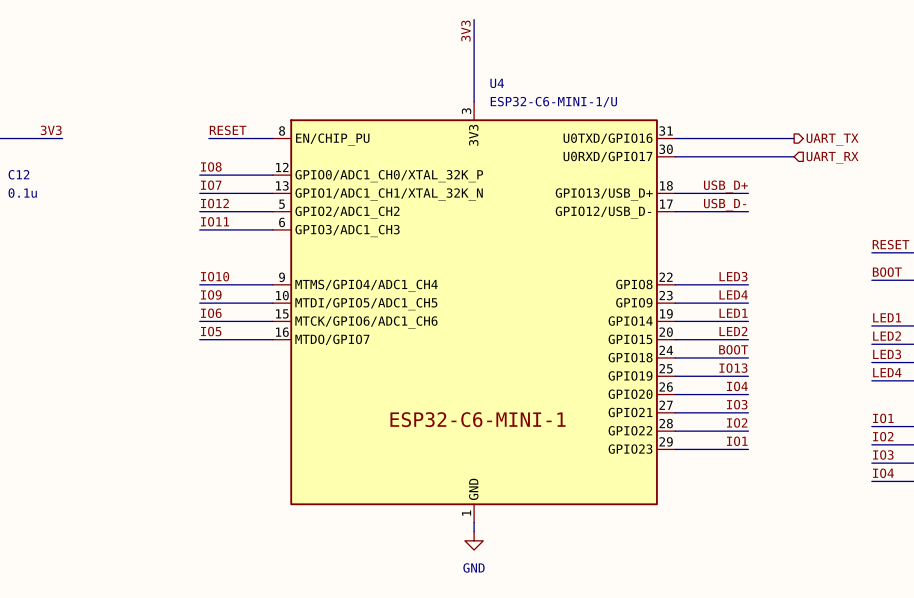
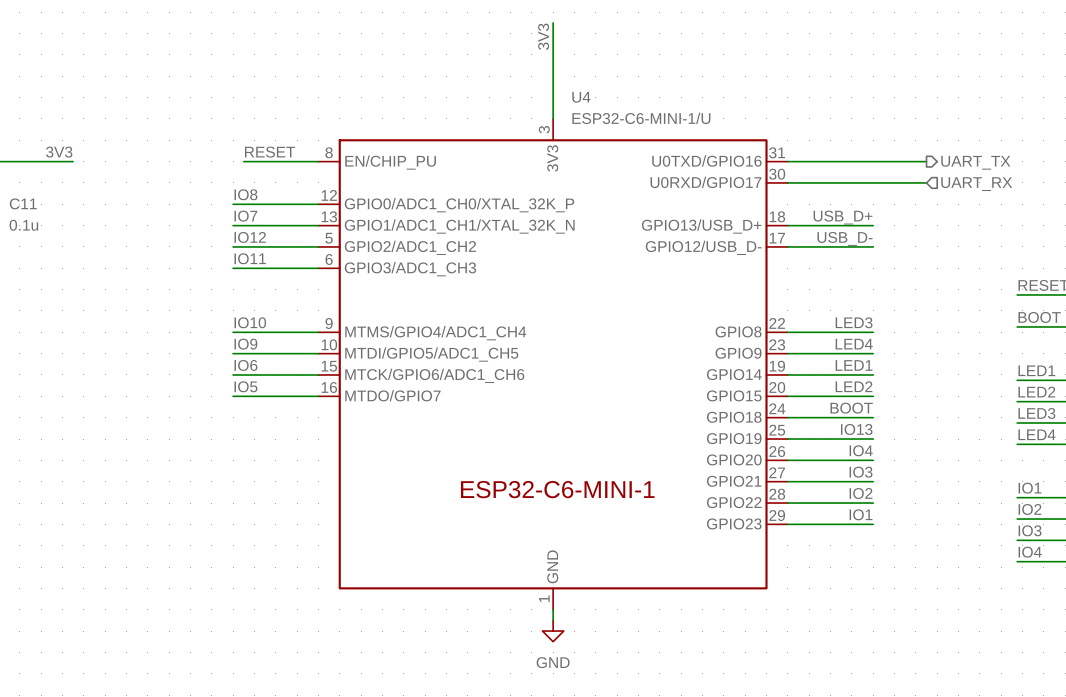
C12 name: C12 (18, 174) -> C11 (23, 203)

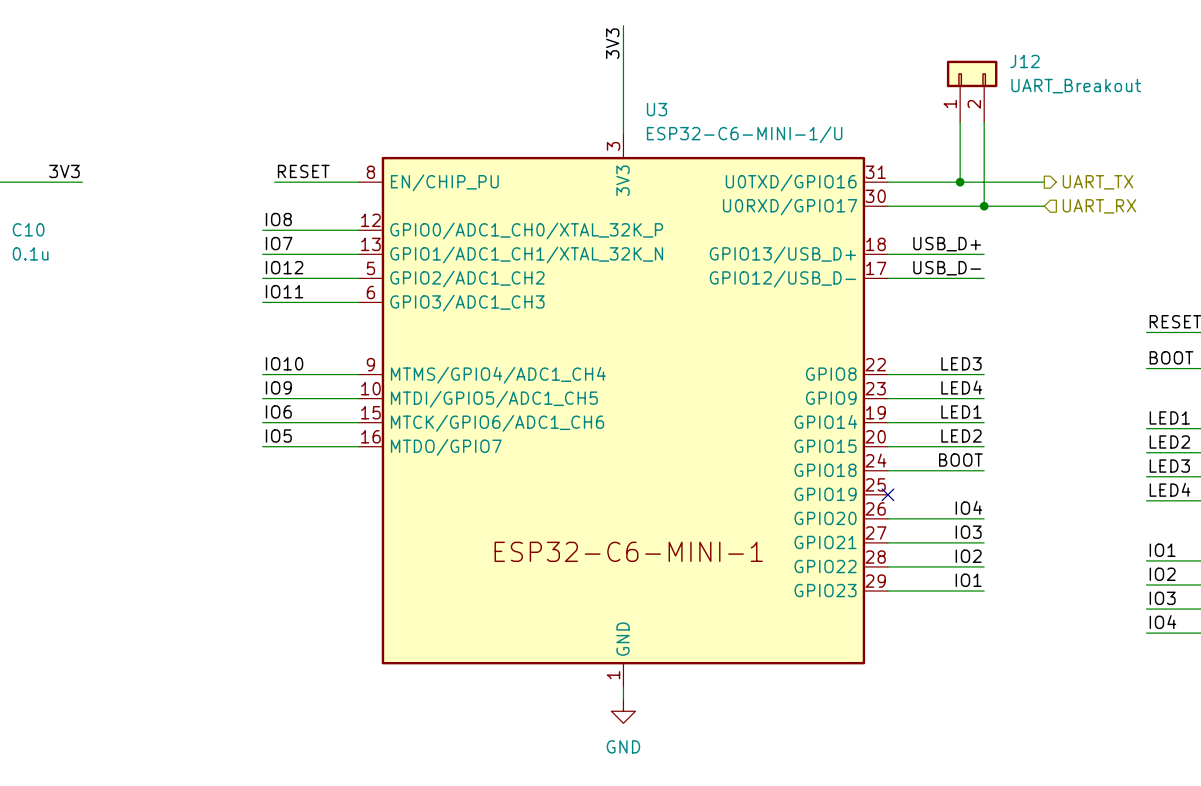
J12: none -> UART_Breakout (972, 91)
U4 name: U4 (581, 97) -> U3 (657, 109)
wire: none -> (960, 122) (960, 182)
wire: none -> (984, 122) (984, 206)
junction: none -> (960, 182)
junction: none -> (984, 206)
C11 name: C11 (23, 203) -> C10 (28, 229)
label: IO13 (856, 429) -> none
wire: (787, 439) (873, 439) -> none
no-connect mark: none -> (887, 494)

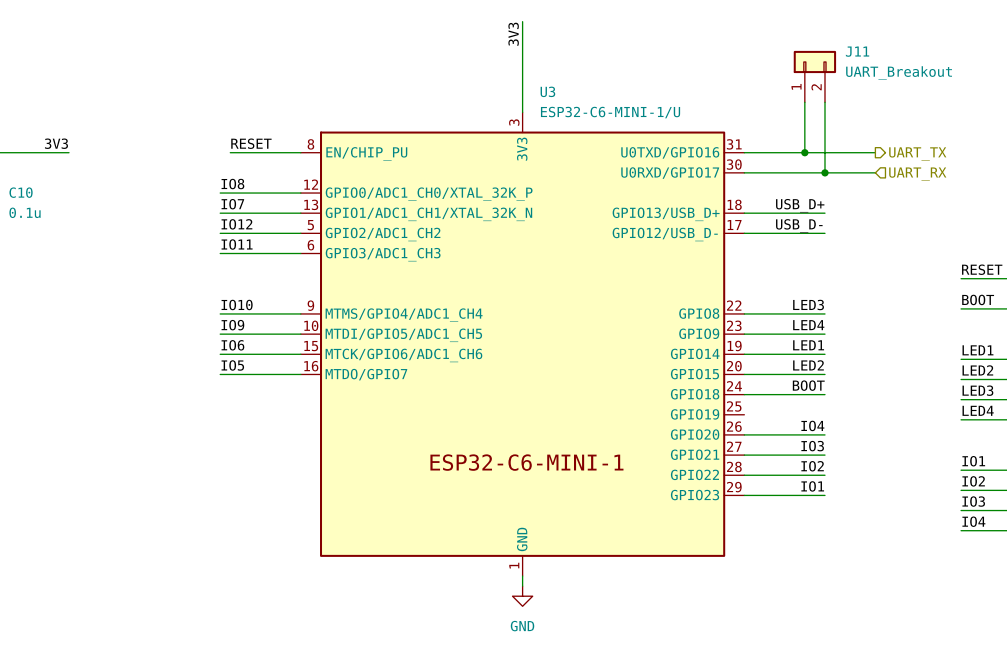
J12 name: J12 (1024, 61) -> J11 (857, 51)
no-connect mark: (887, 494) -> none

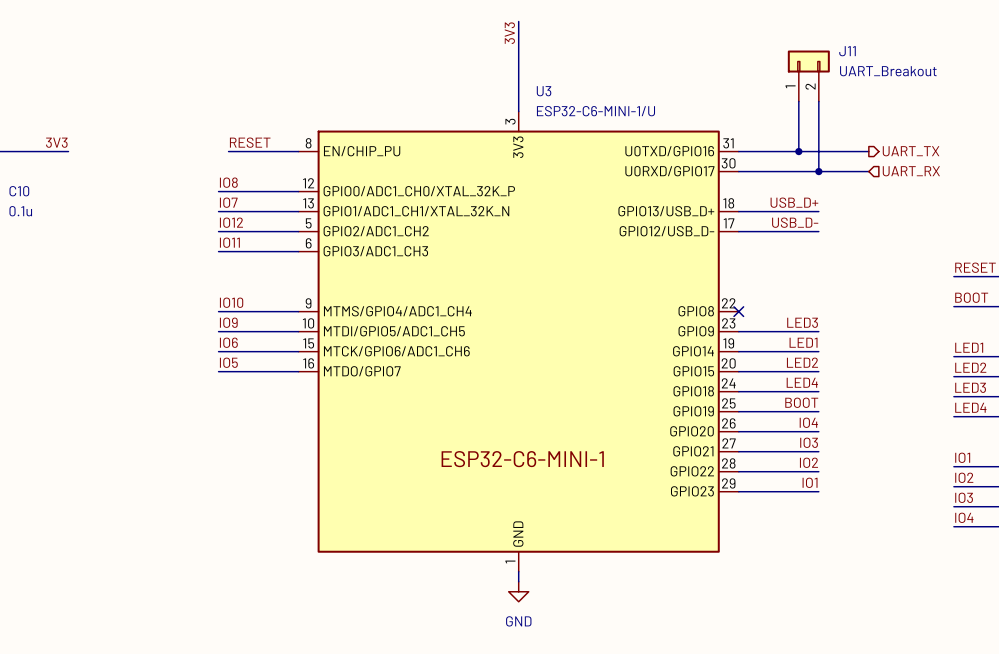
label: LED3 (808, 304) -> none
wire: (744, 313) (824, 313) -> (738, 411) (818, 411)
no-connect mark: none -> (738, 311)
label: LED4 (808, 325) -> LED3 (802, 322)
label: BOOT (808, 385) -> LED4 (802, 382)
label: none -> BOOT (801, 402)

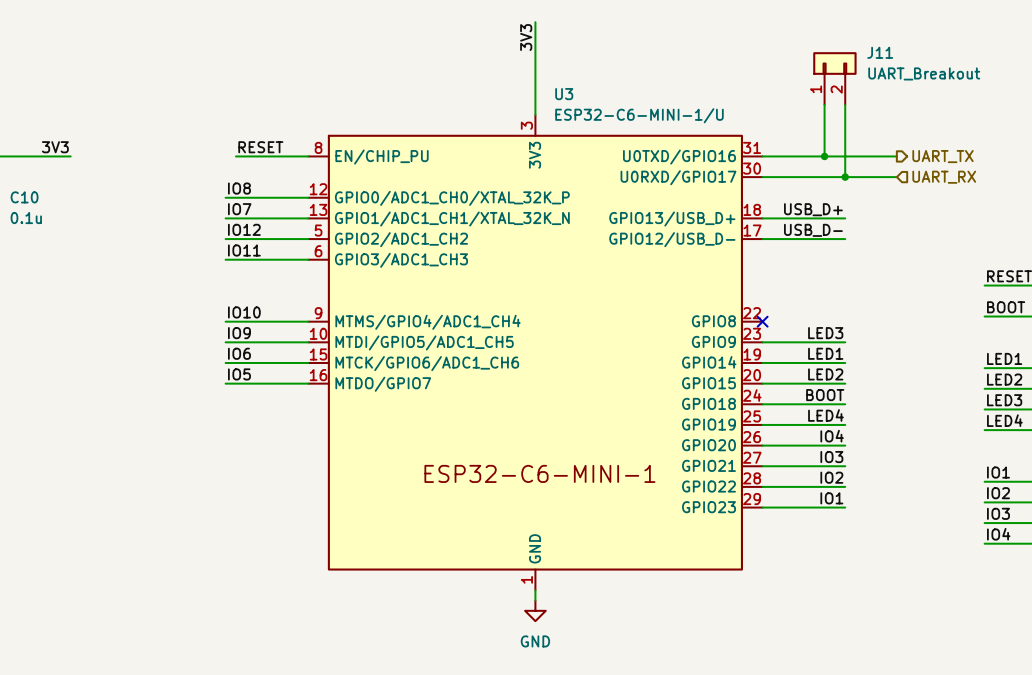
label: LED4 (802, 382) -> BOOT (825, 395)
label: BOOT (801, 402) -> LED4 (825, 415)

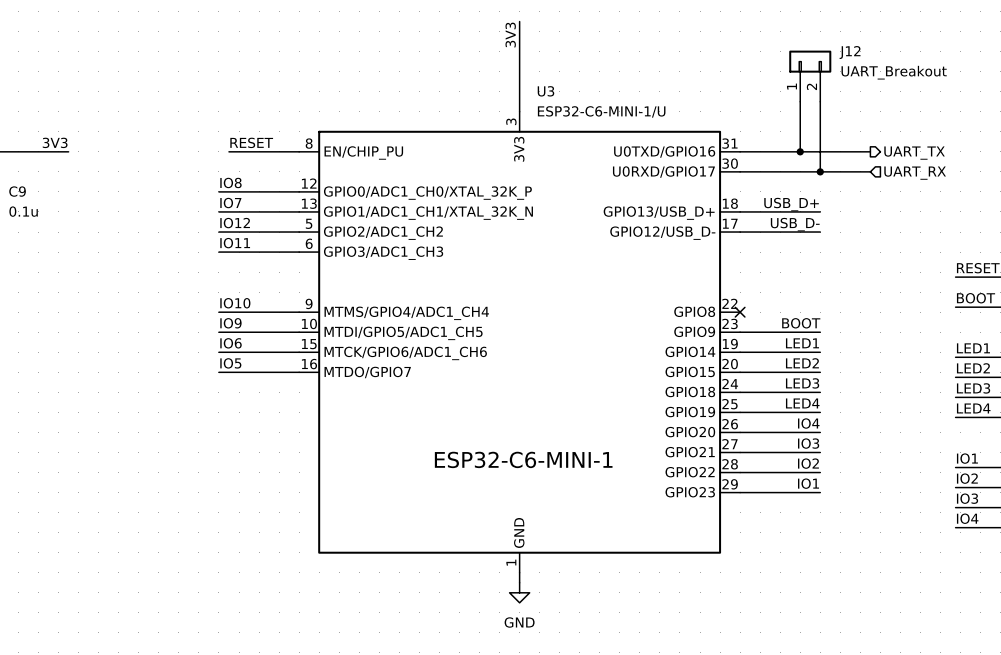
J11 name: J11 (880, 52) -> J12 (850, 52)
C10 name: C10 (24, 197) -> C9 (17, 191)
label: LED3 (825, 333) -> BOOT (801, 323)
label: BOOT (825, 395) -> LED3 (802, 383)

